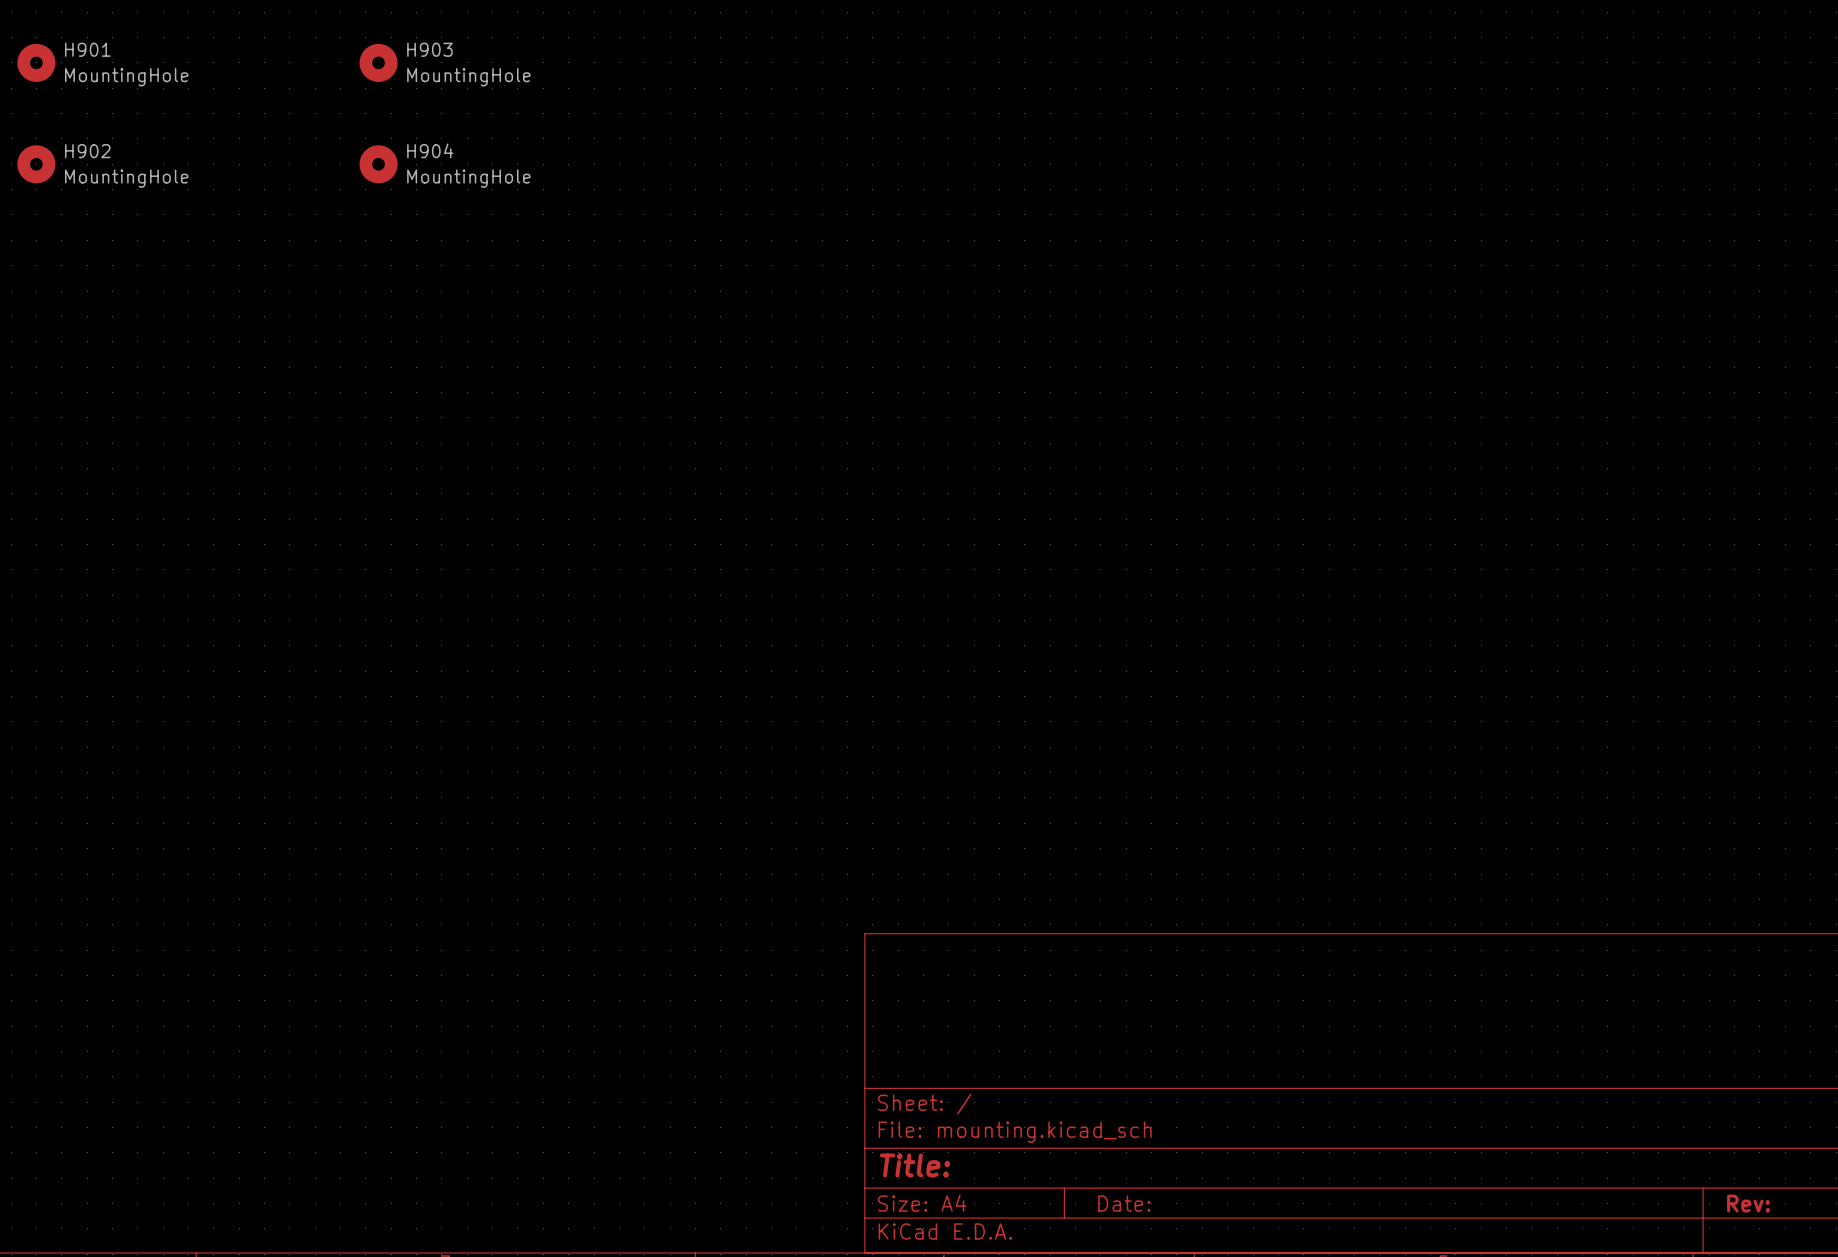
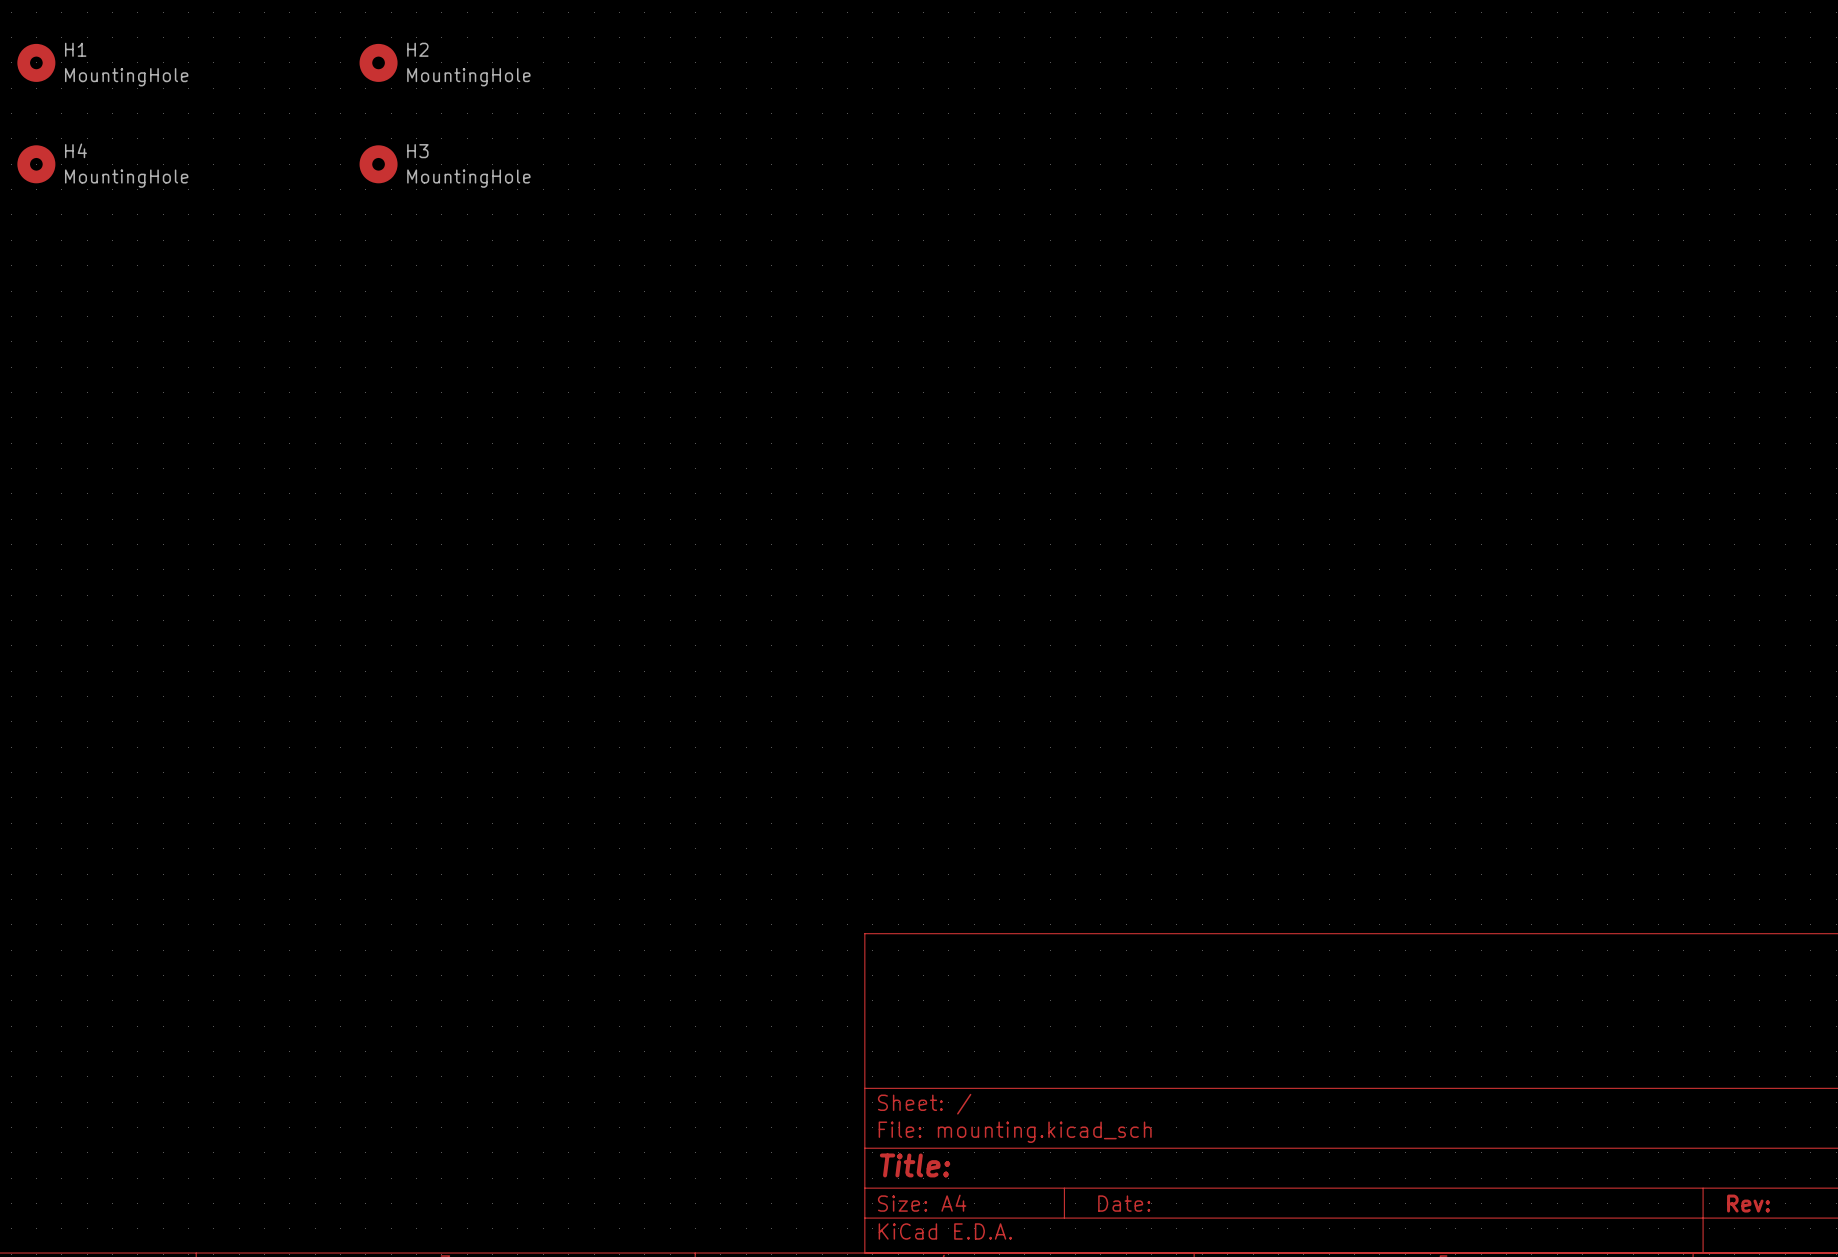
H901 name: H901 (87, 49) -> H1 (75, 49)
H903 name: H903 (429, 49) -> H2 (417, 49)
H904 name: H904 (430, 150) -> H3 (417, 151)
H902 name: H902 (87, 151) -> H4 (76, 150)

